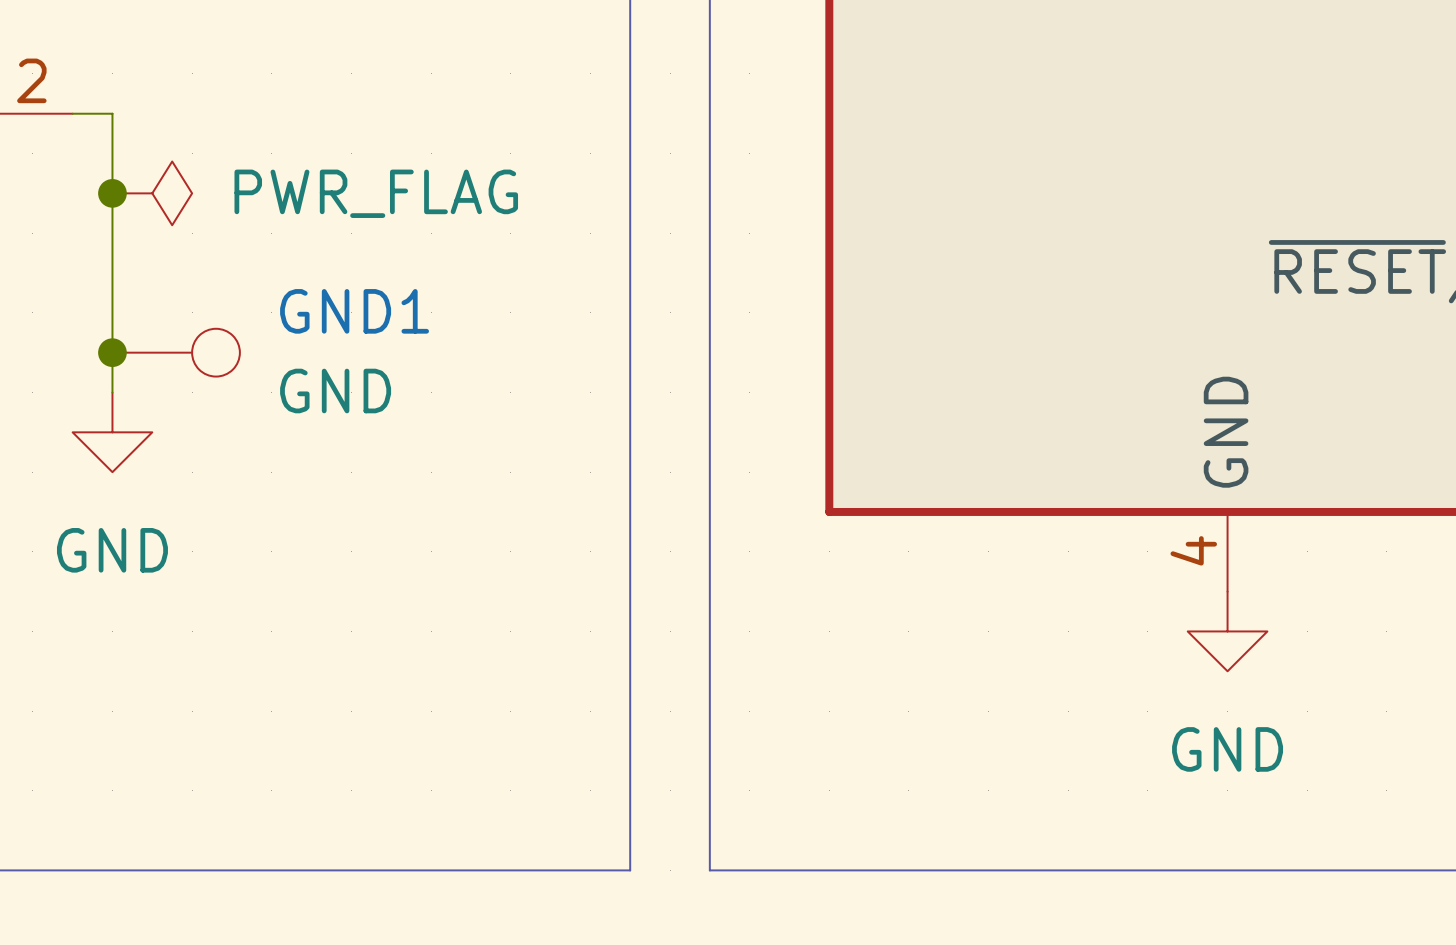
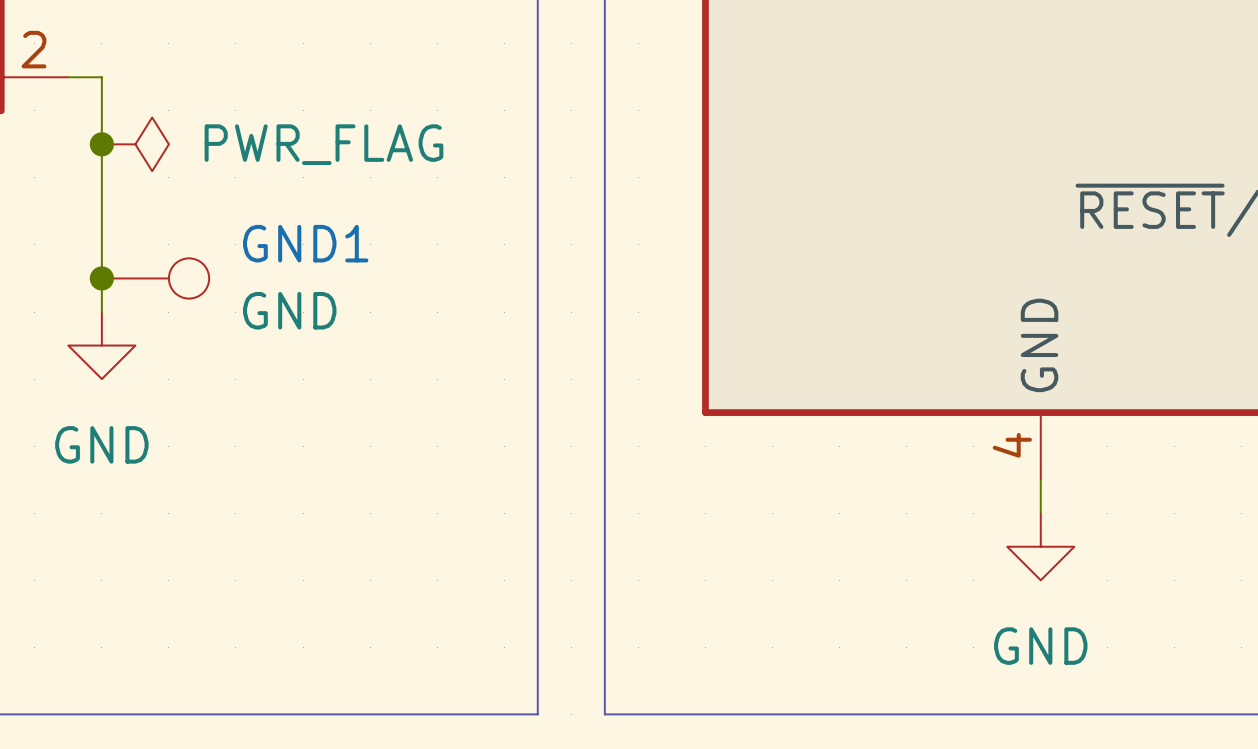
power symbol position: GND (1227, 631) -> GND (1040, 546)

